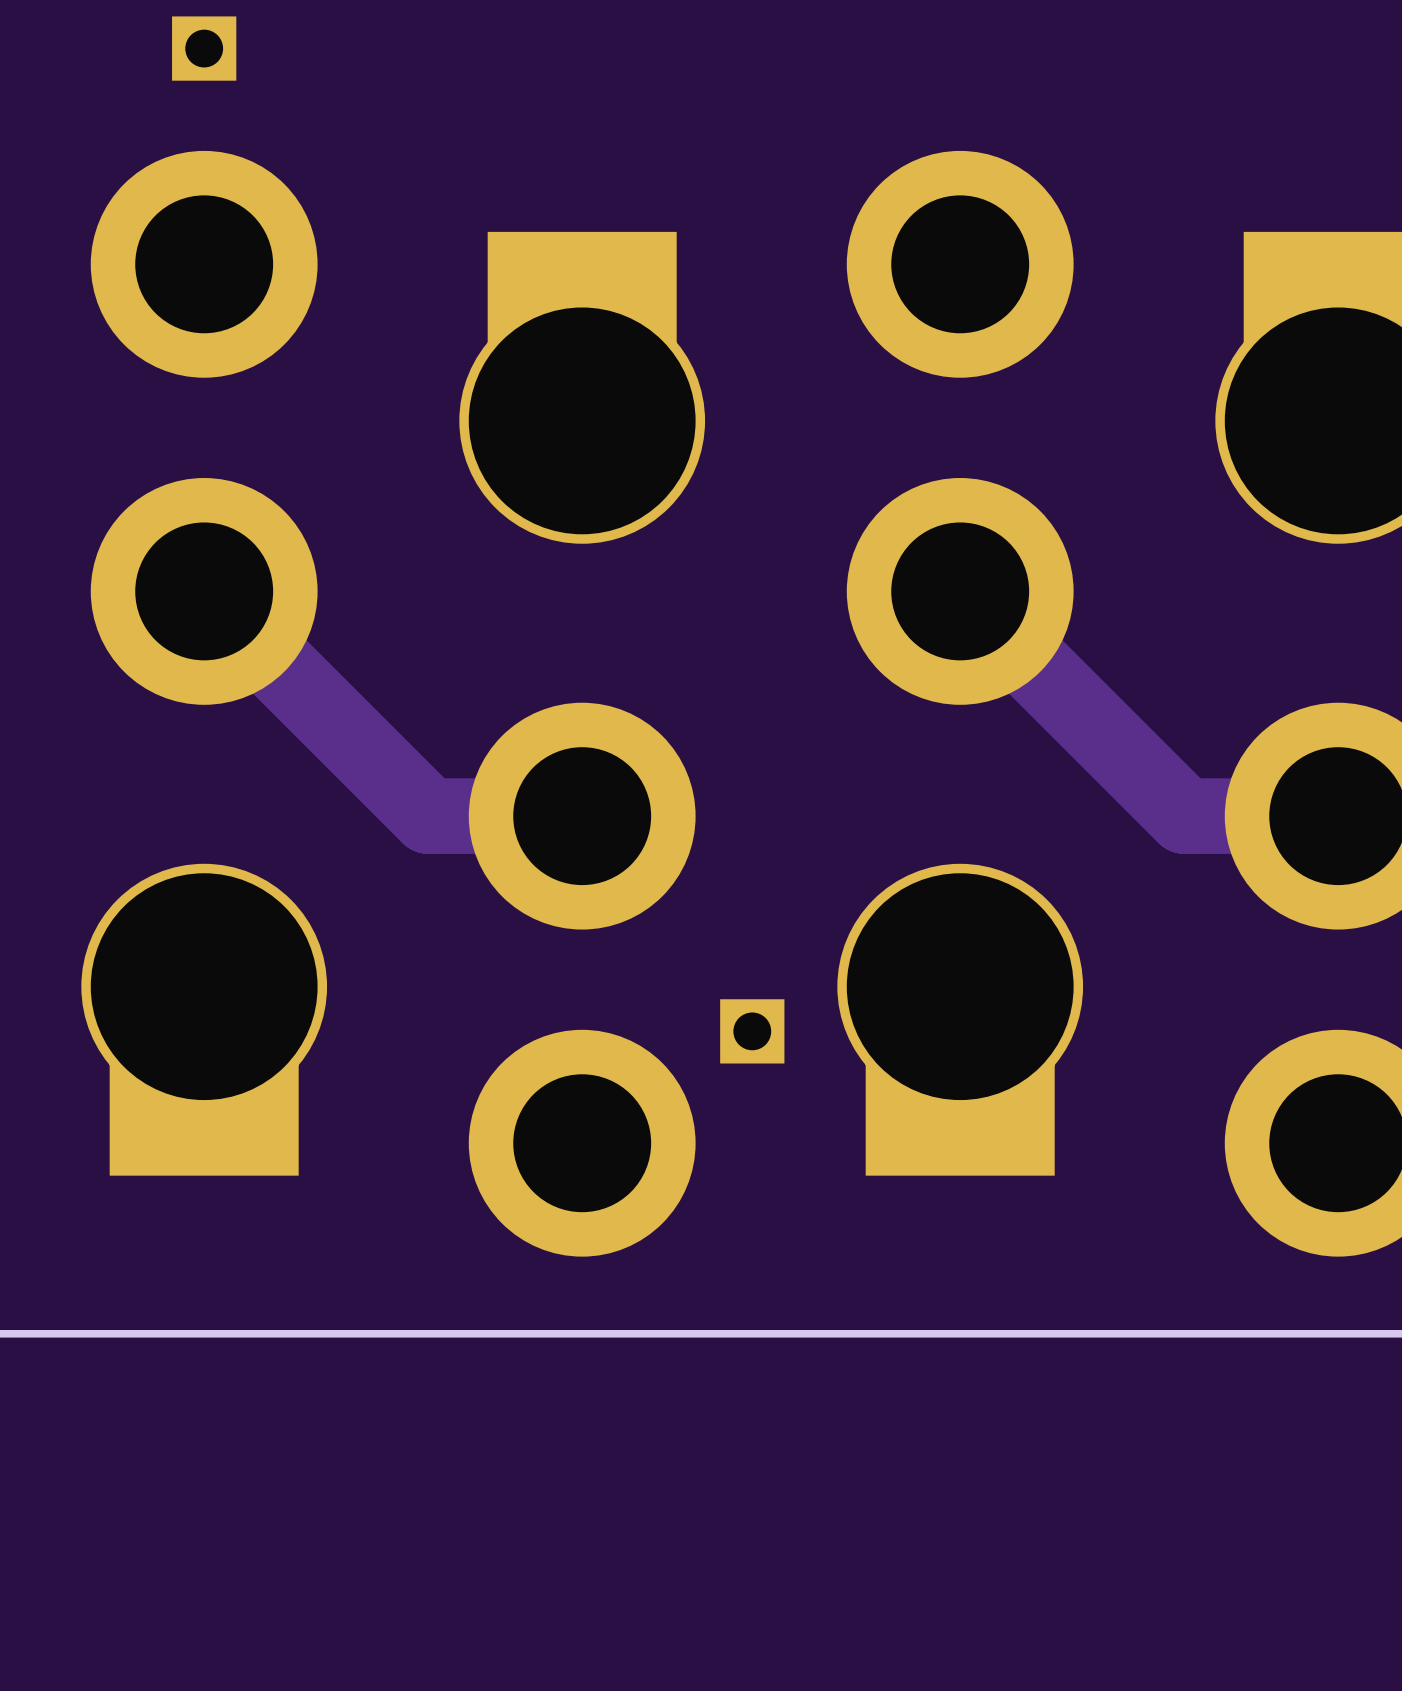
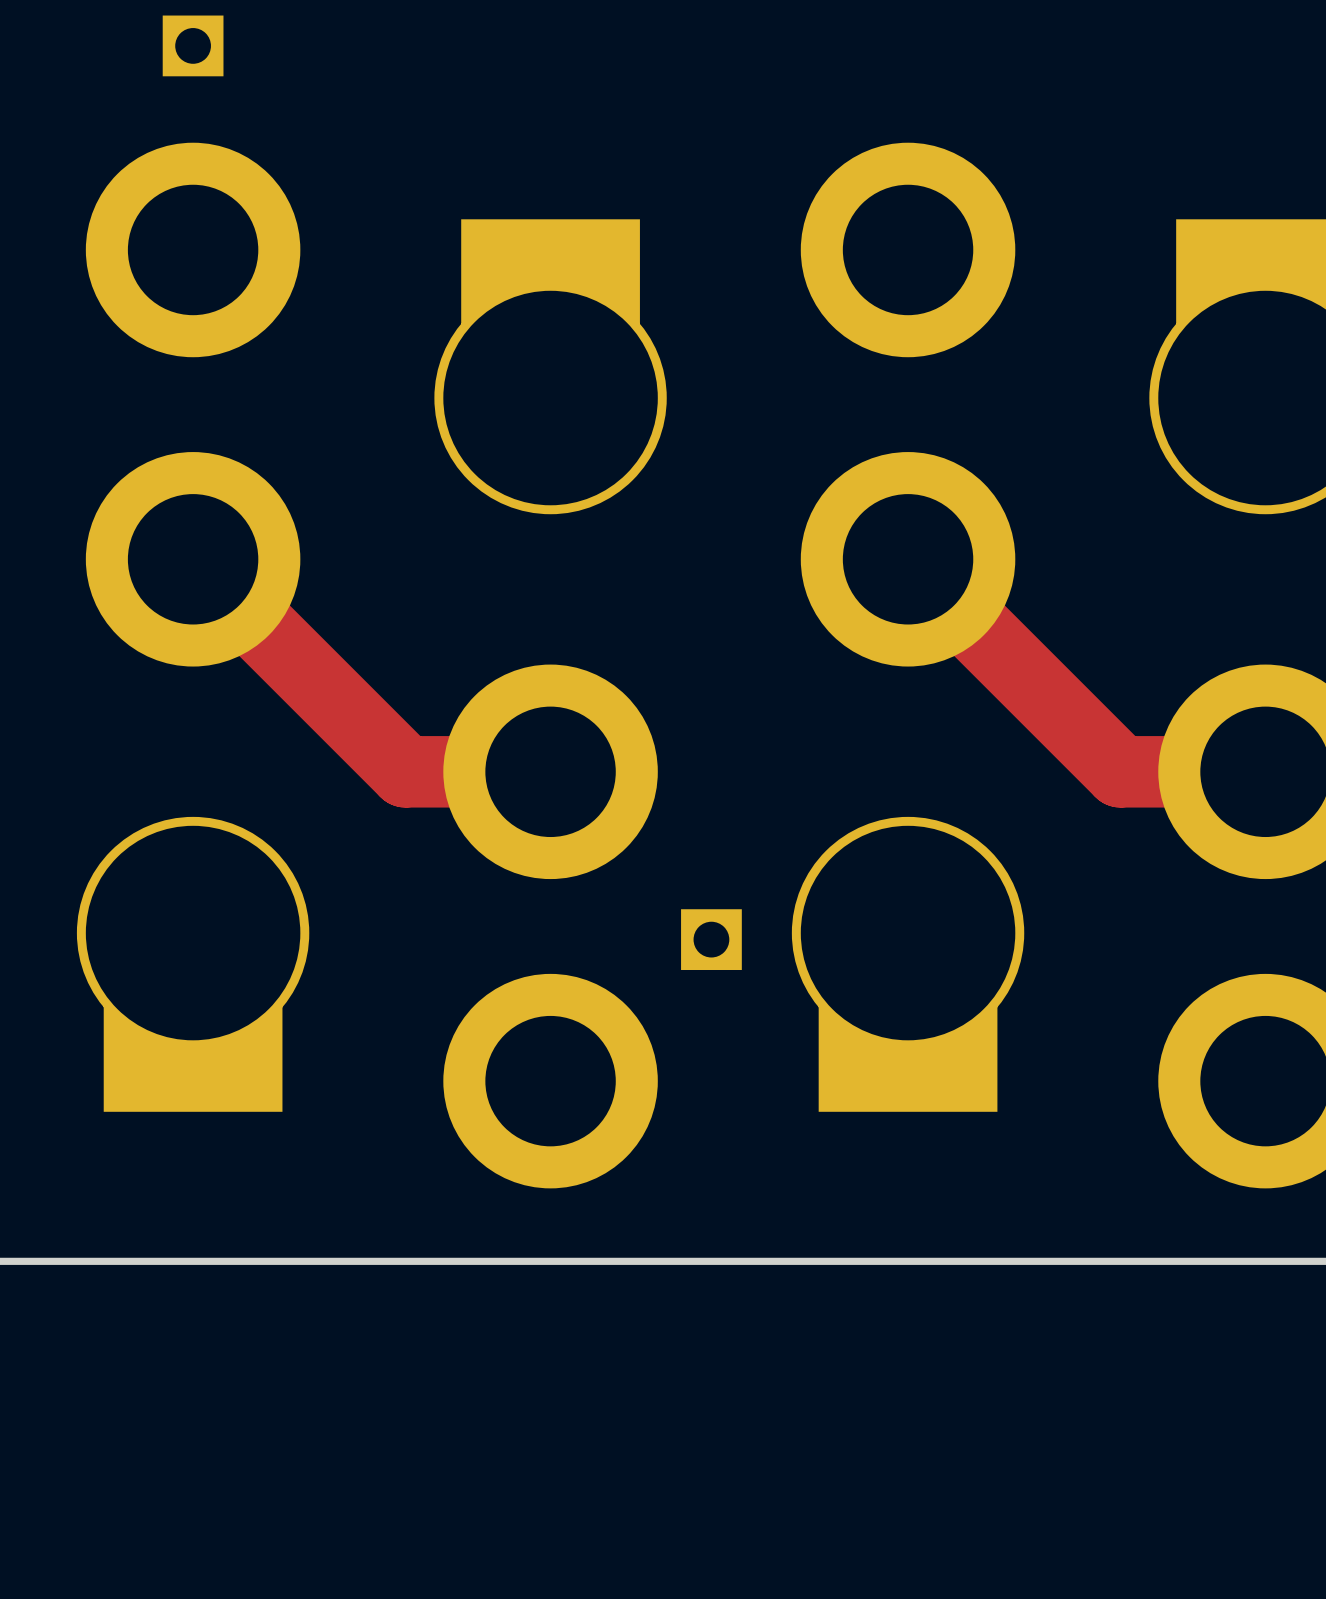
part position: (752, 1031) -> (711, 939)

